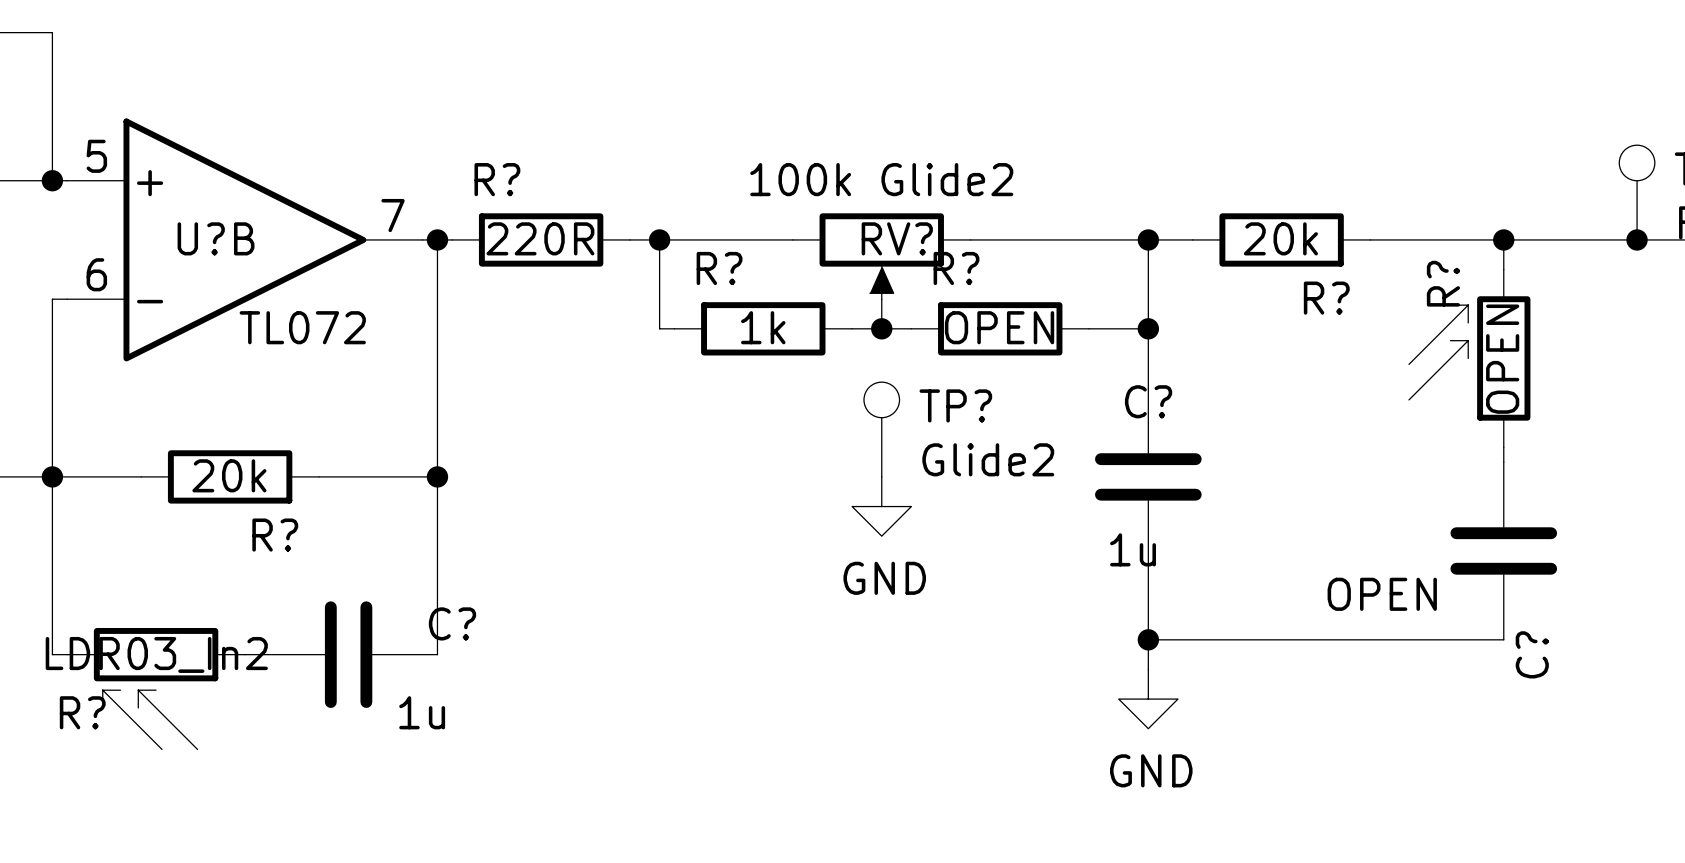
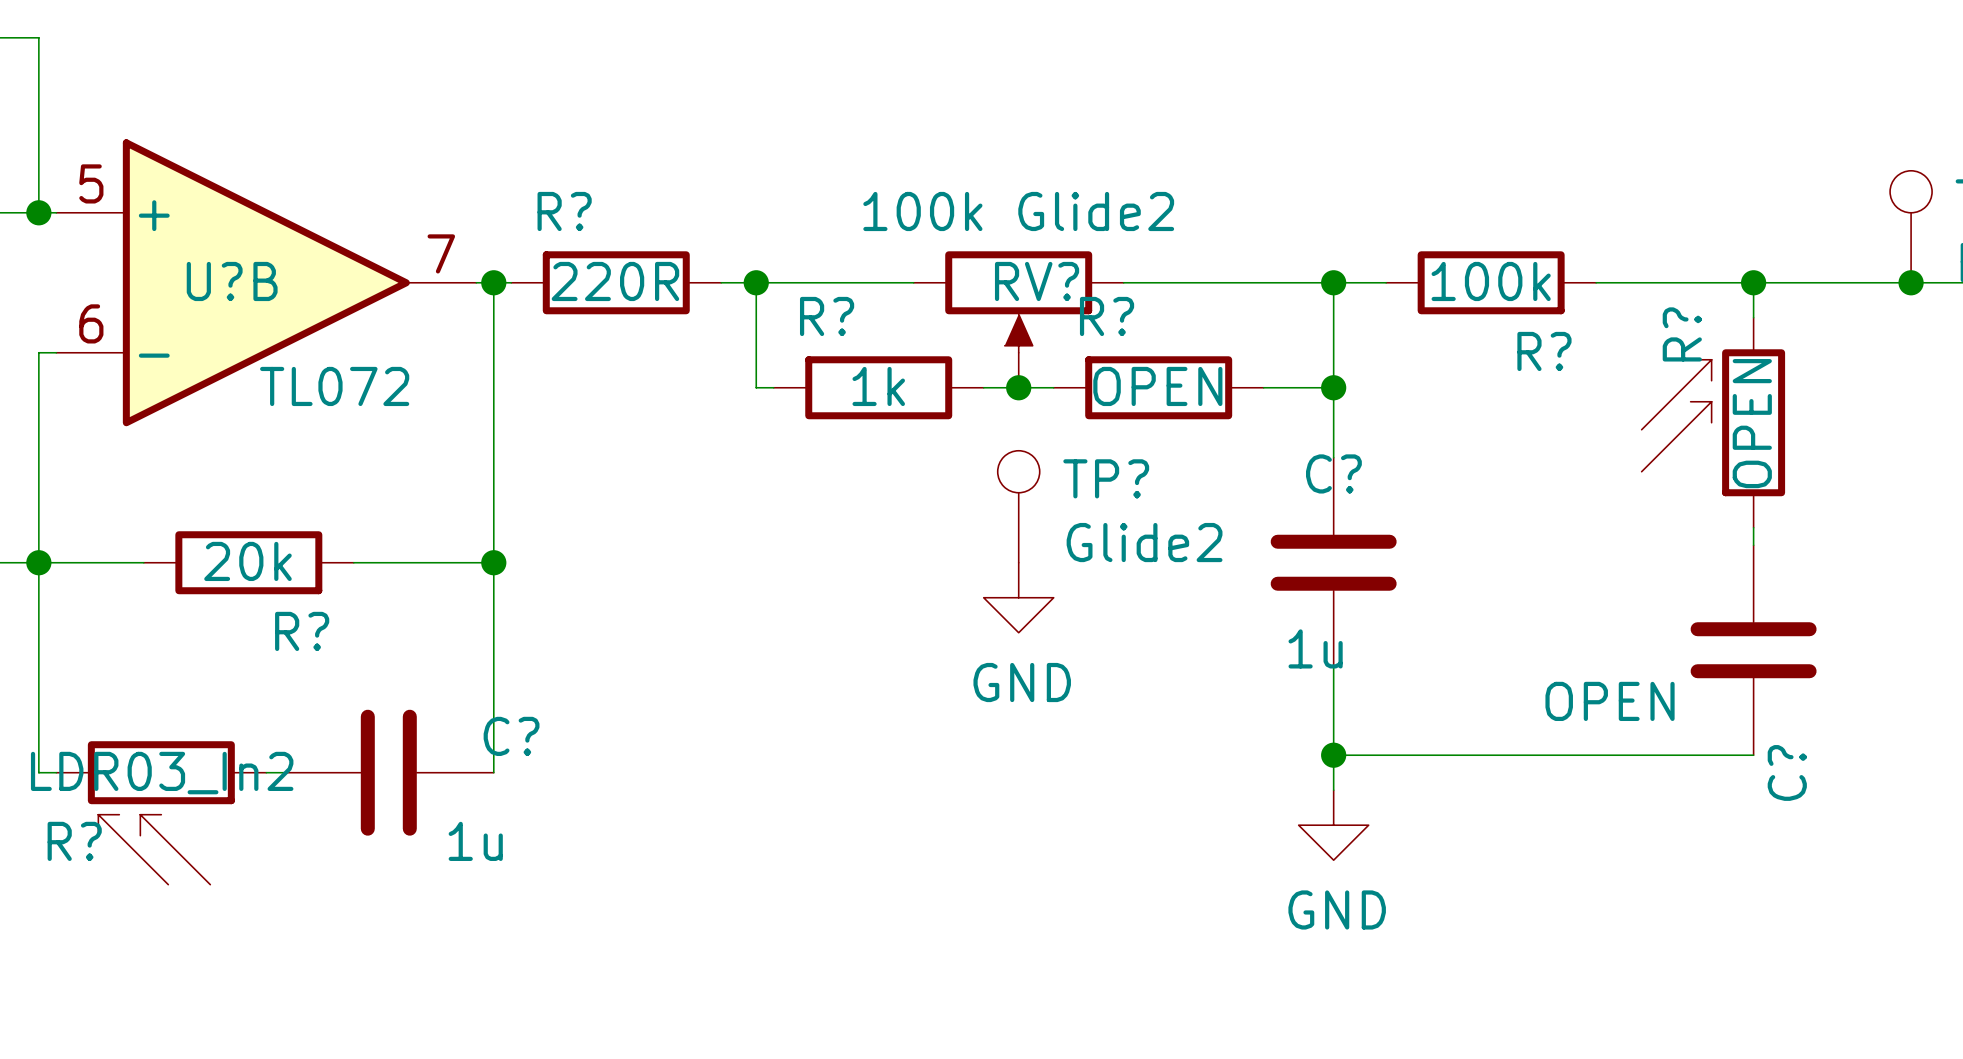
R? value: 20k (1280, 238) -> 100k (1491, 281)

